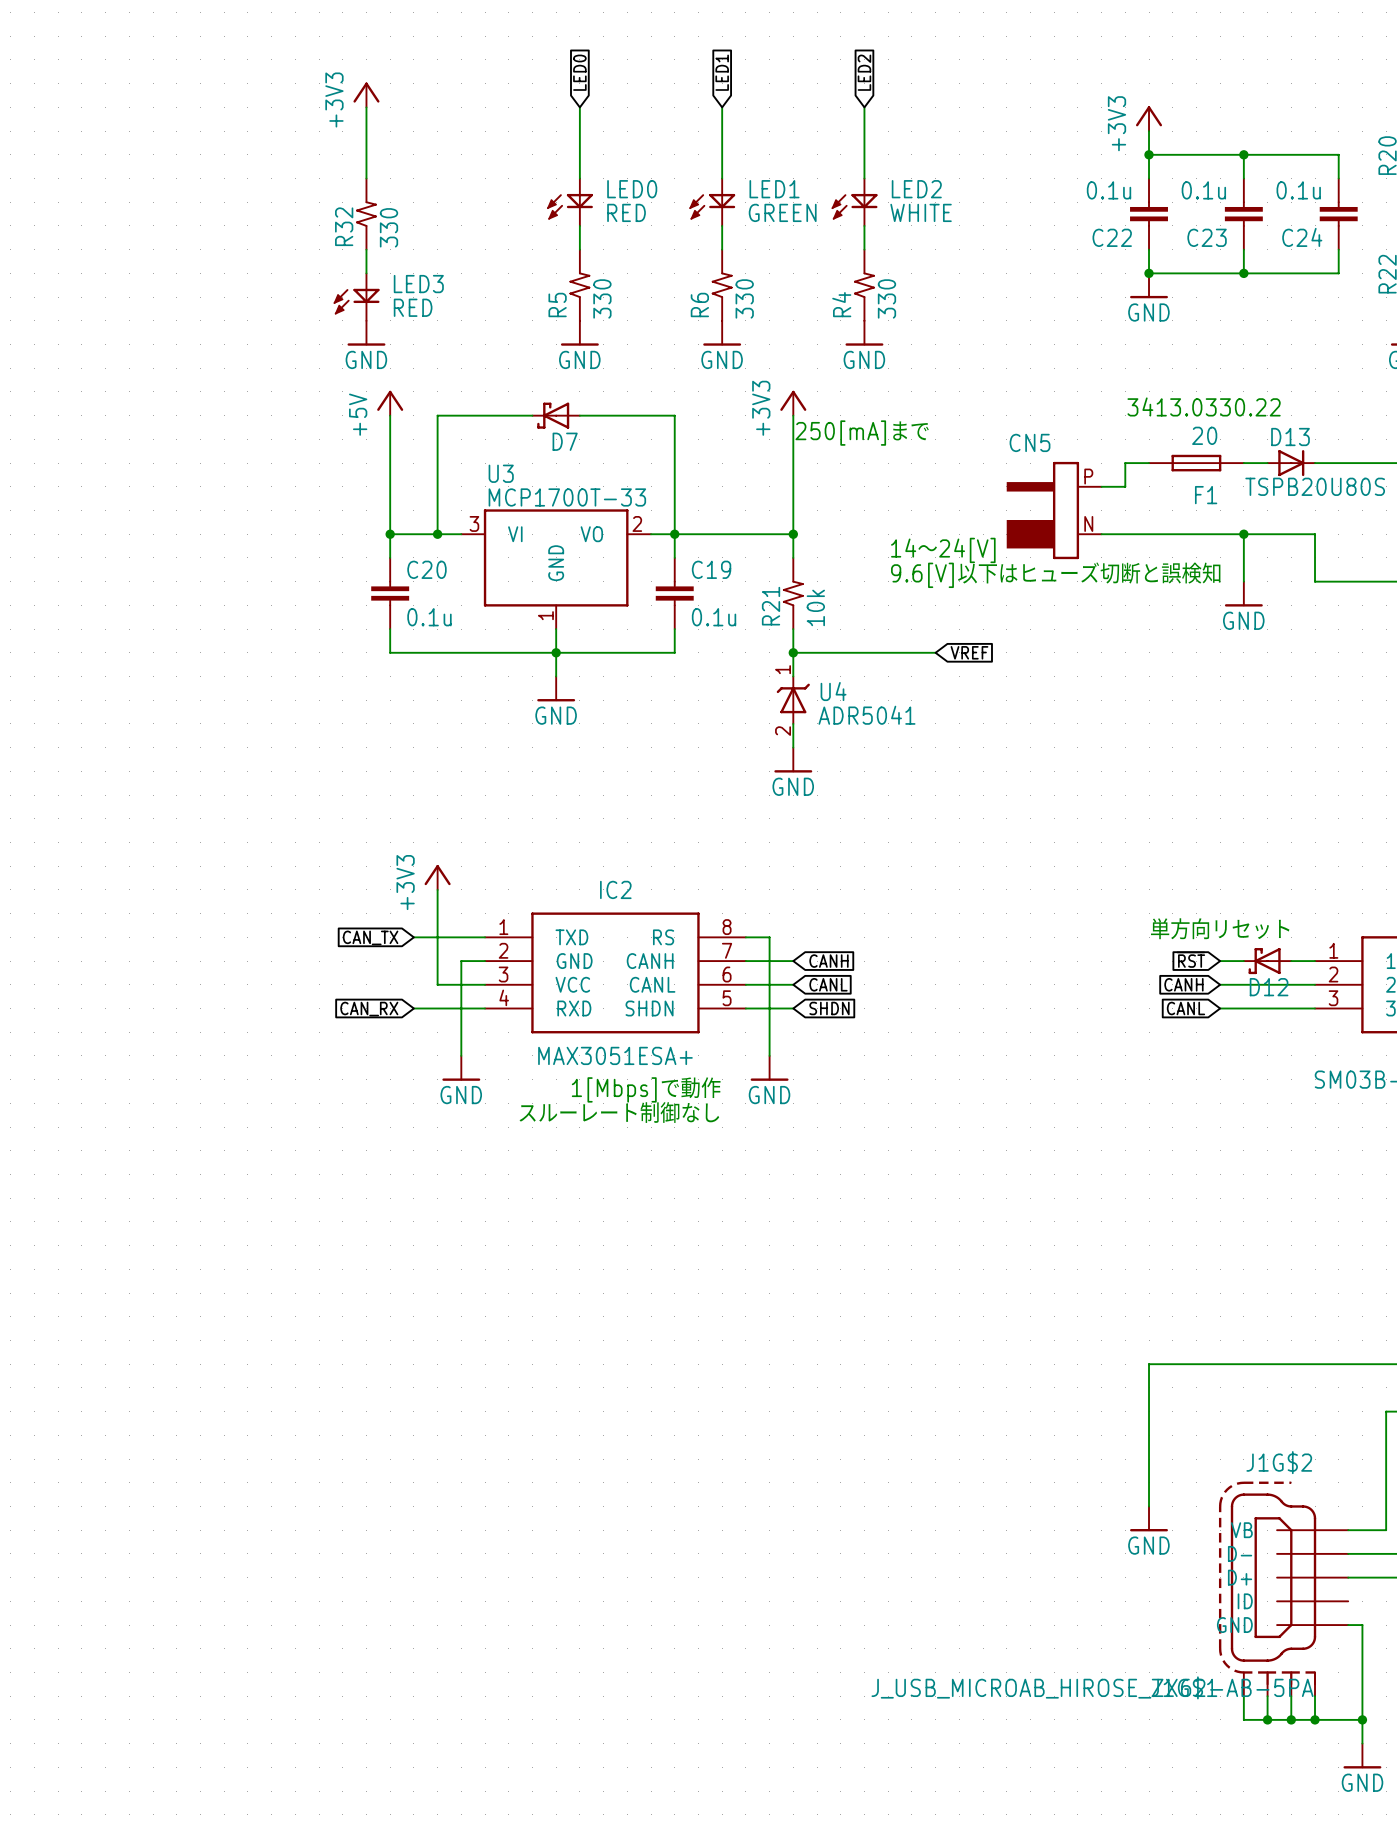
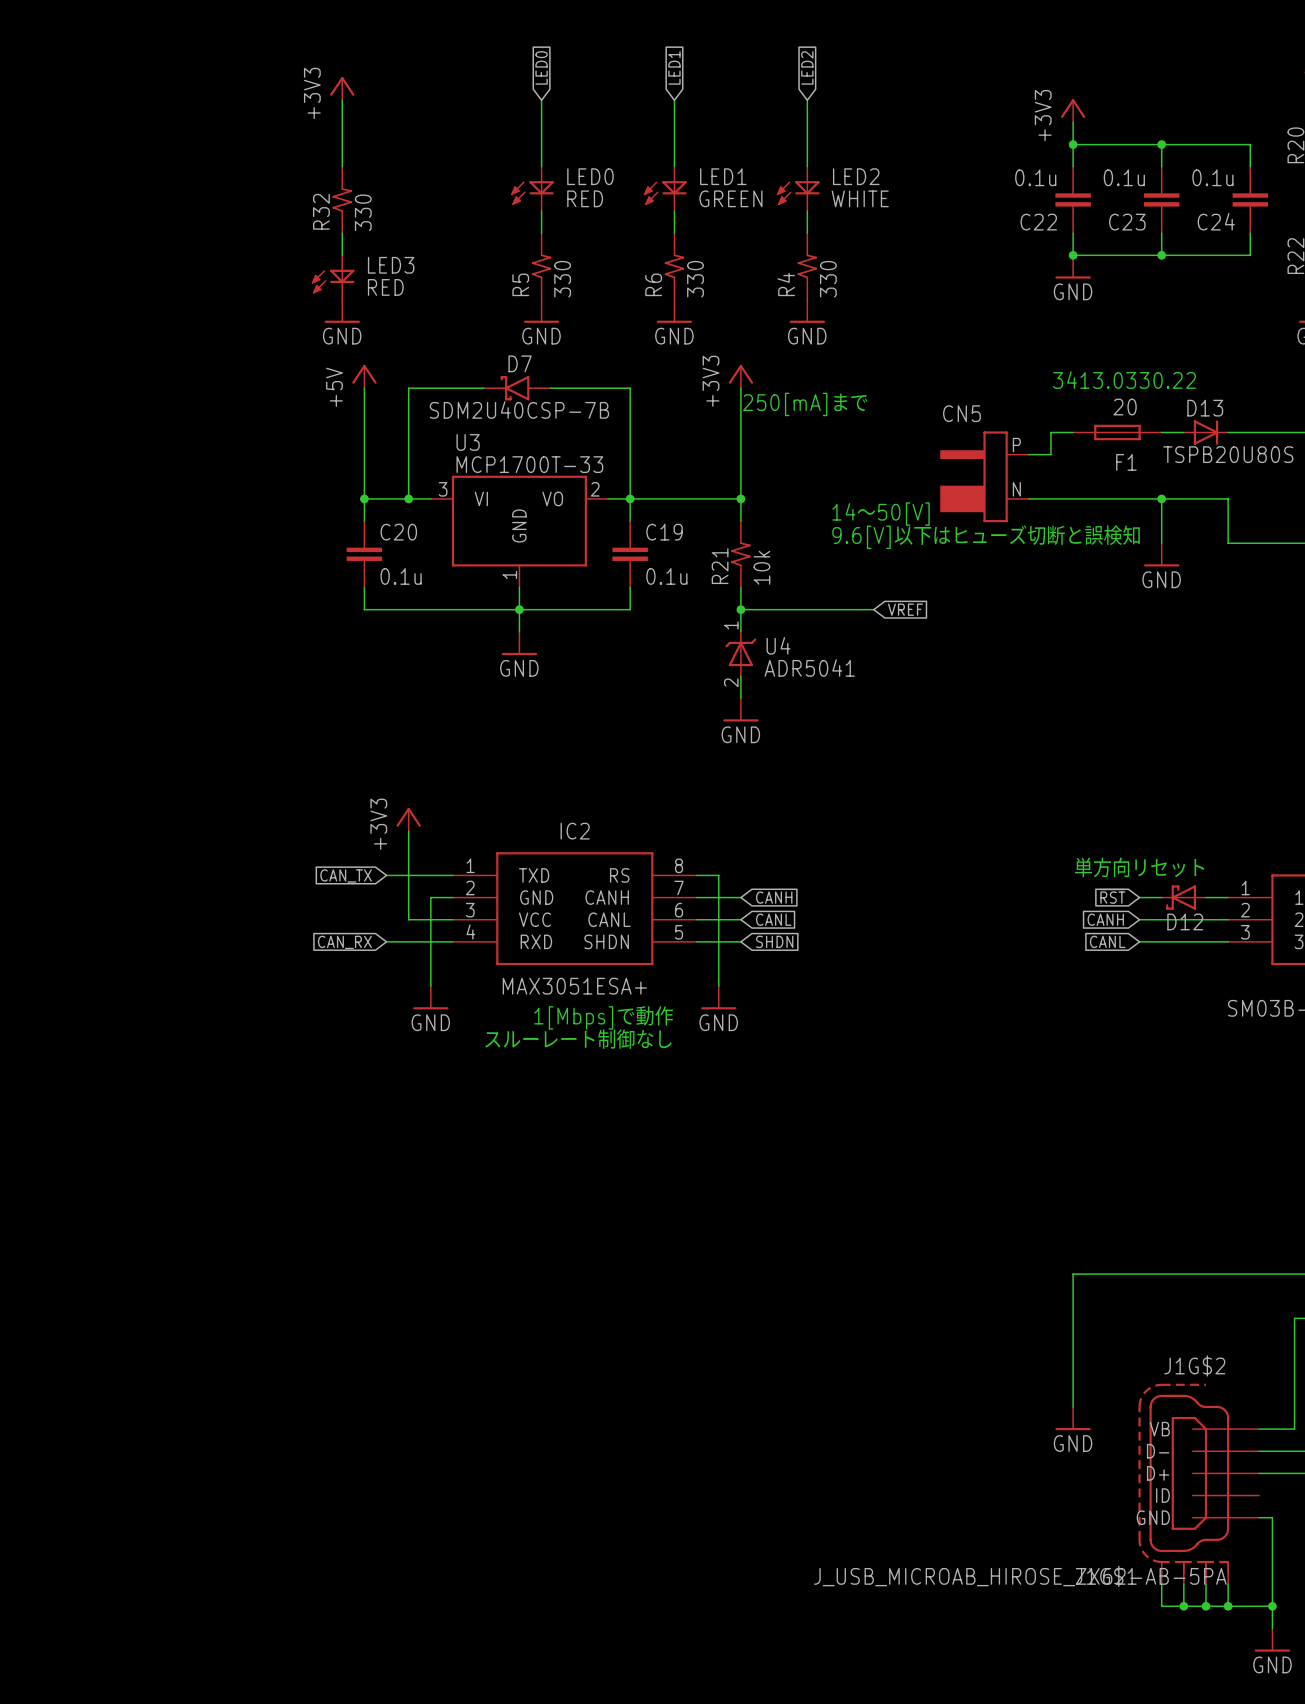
D7 symbol: [532, 402, 580, 429] -> [484, 376, 551, 401]
D7 value: none -> SDM2U40CSP-7B (519, 409)
D7 name position: D7 (565, 441) -> D7 (520, 363)
text: 14～24[V] (943, 550) -> 14～50[V] (881, 514)

